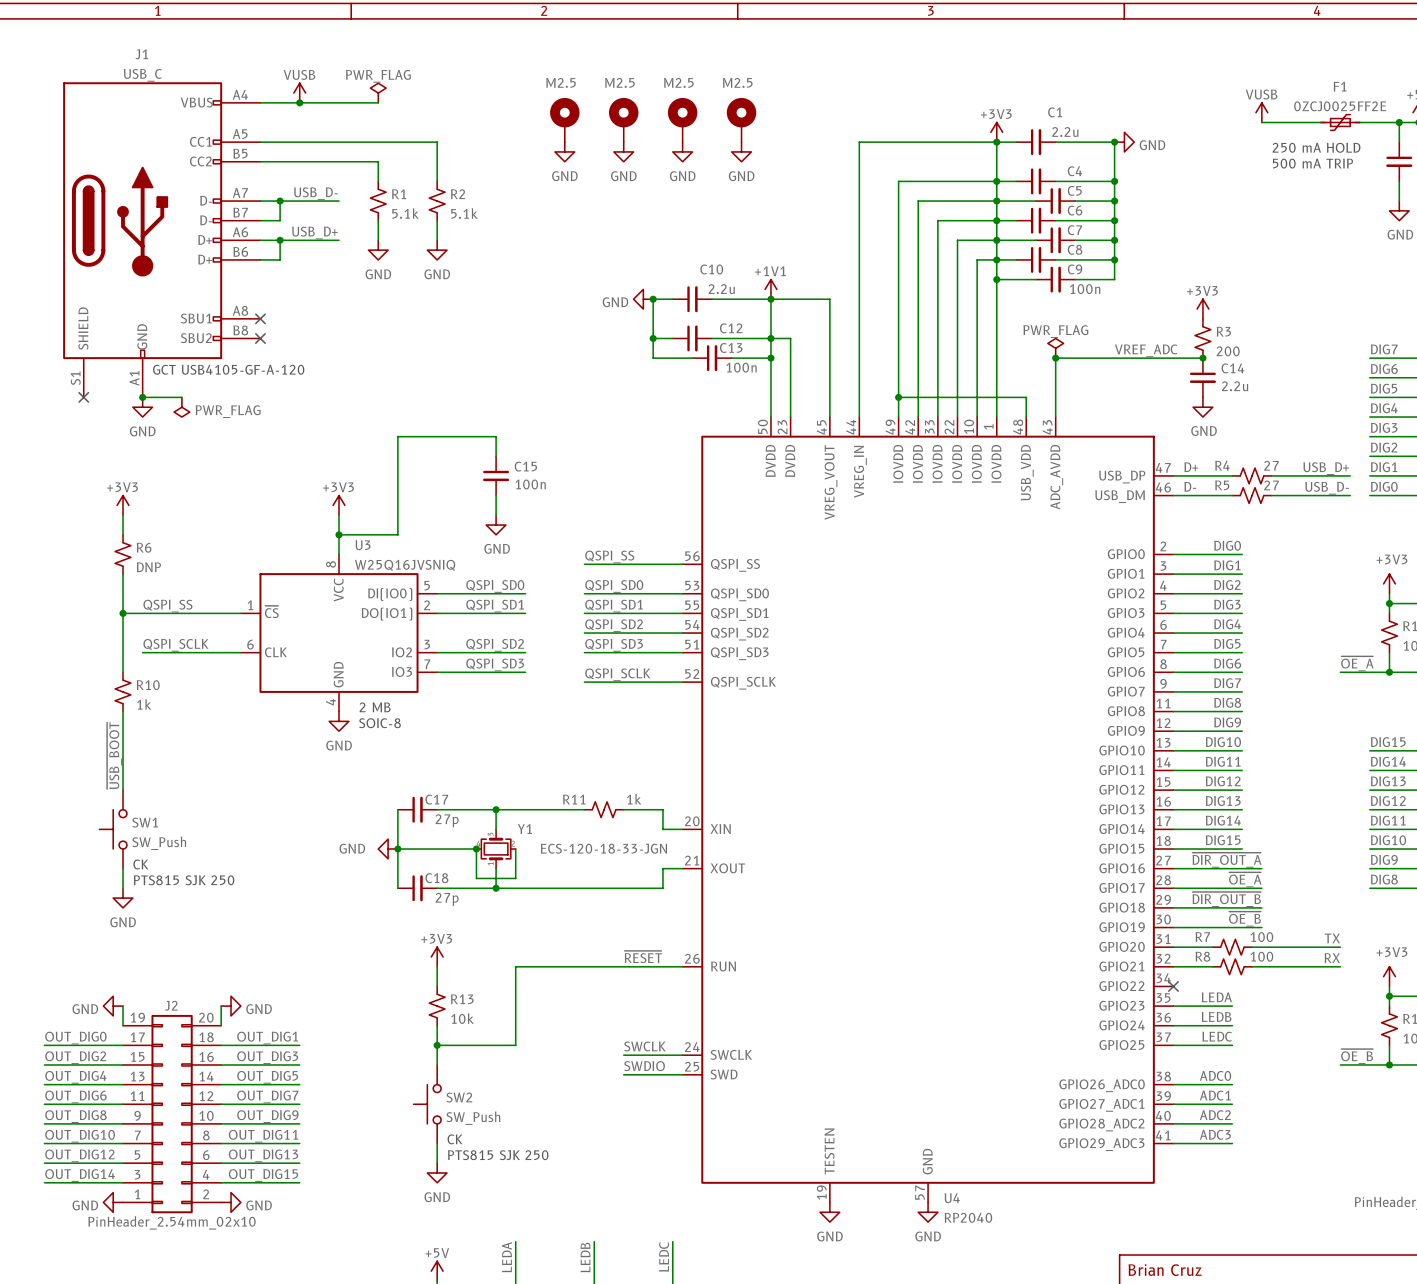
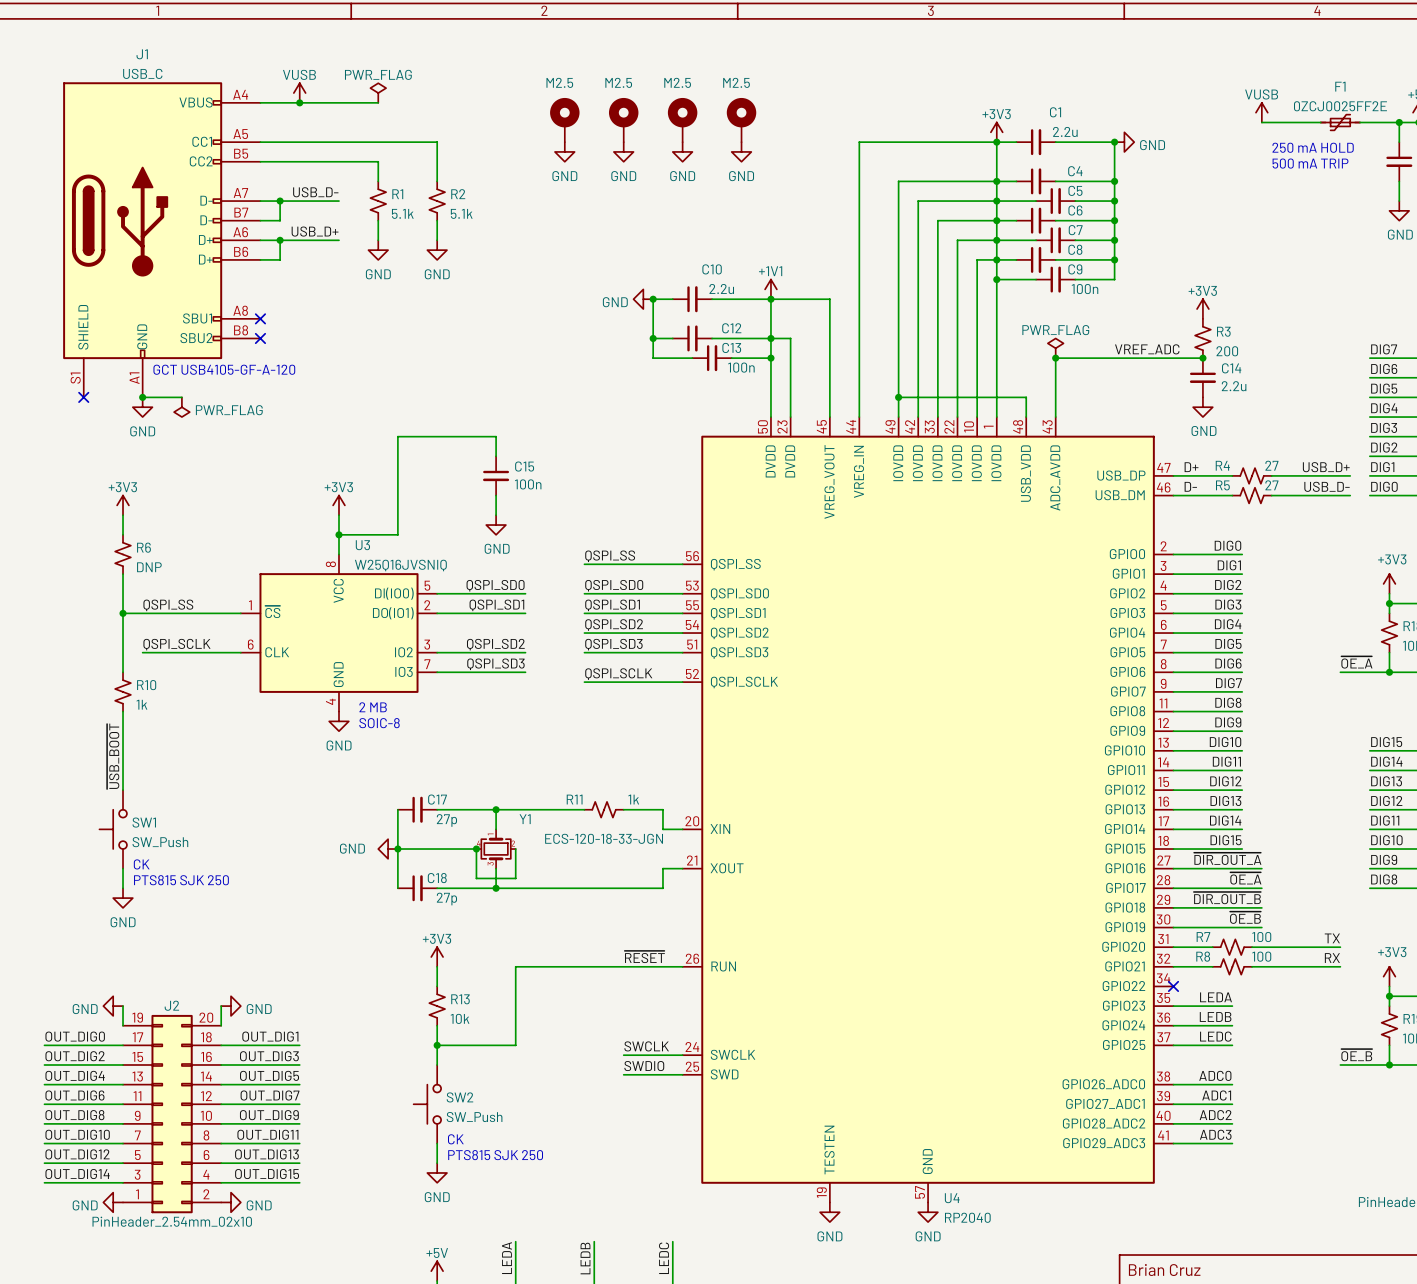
Y1 flip: as is (496, 849) -> up-down (496, 849)

